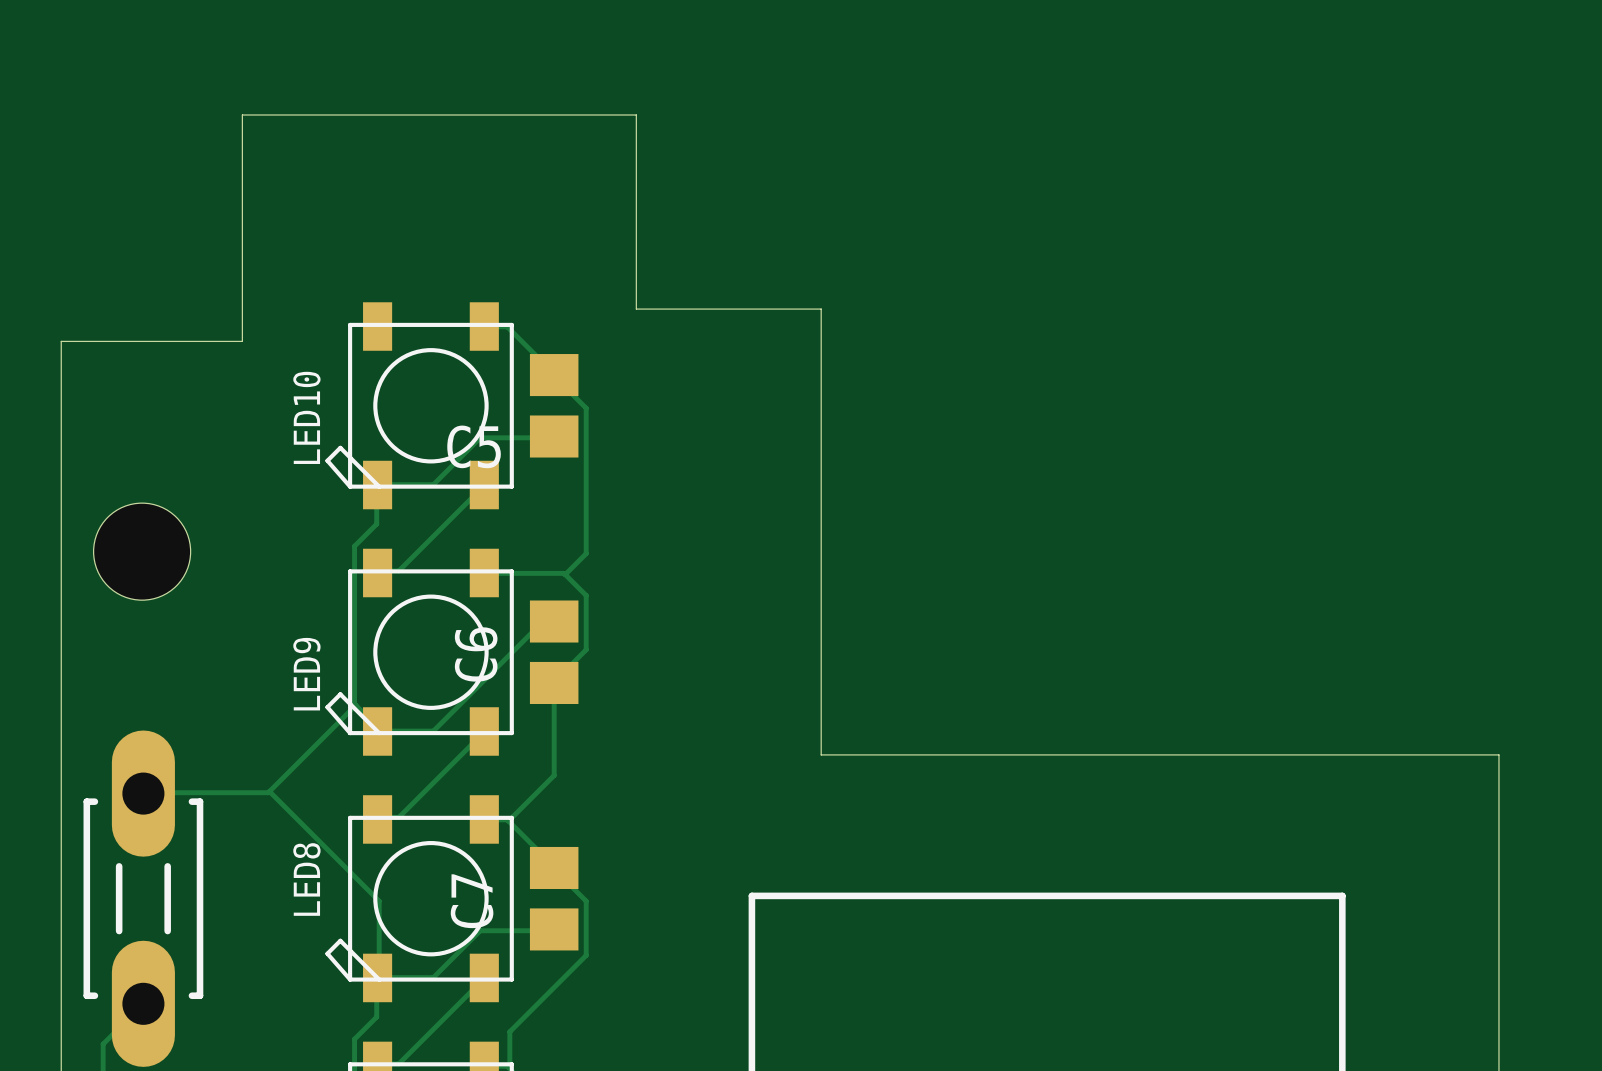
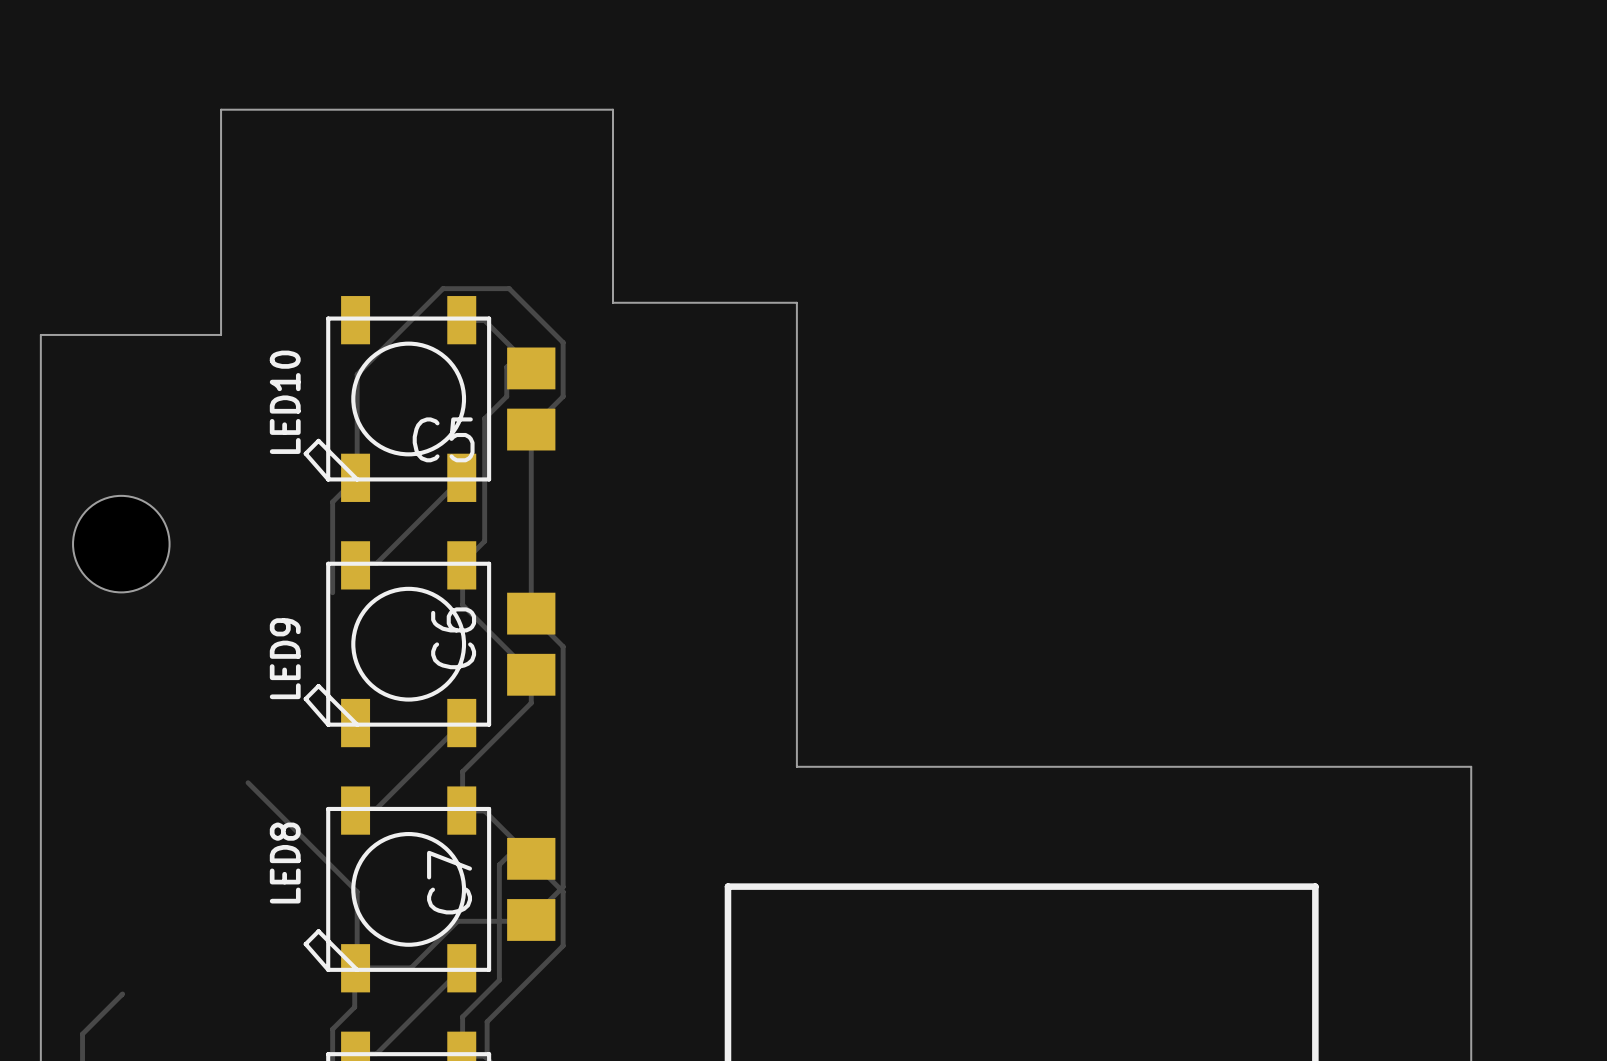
track: none -> (507, 365) (506, 396) (484, 418) (484, 541) (461, 565)
track: (554, 375) (586, 408) (586, 553) (565, 574) -> none
track: (554, 437) (480, 437) (433, 484) (379, 484) -> (531, 429) (563, 396) (563, 342) (509, 288) (442, 288) (357, 374) (357, 477)
track: (376, 487) (376, 524) (354, 546) -> (354, 479) (332, 501) (332, 538)
track: (485, 573) (564, 573) (586, 595) (586, 649) (554, 681) -> (462, 565) (462, 604) (531, 673)
track: (354, 600) (354, 704) (379, 728) (377, 731) (433, 731) (541, 622) (554, 622) -> (531, 430) (531, 613)
track: none -> (531, 614) (563, 646) (563, 886) (531, 919)
track: (355, 705) (268, 792) (143, 793) -> none
track: (554, 711) (554, 775) (508, 821) -> (531, 703) (462, 771) (461, 810)
board edge: (821, 754) (1498, 754) (1498, 775) -> (796, 746) (796, 766) (1471, 766)
track: none -> (507, 856) (499, 864) (499, 980) (462, 1016) (461, 1055)
part: (143, 898) -> none

